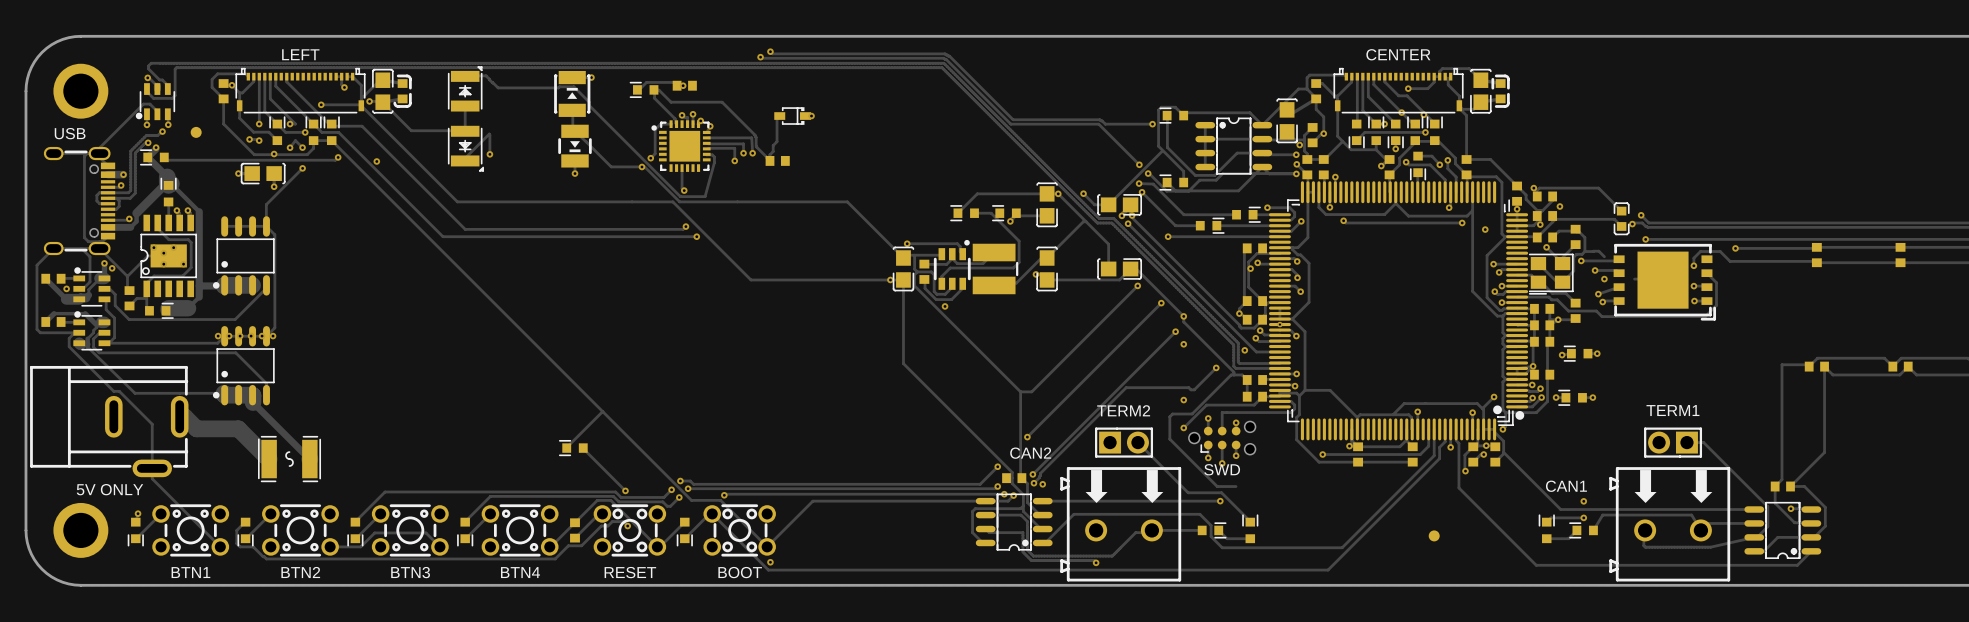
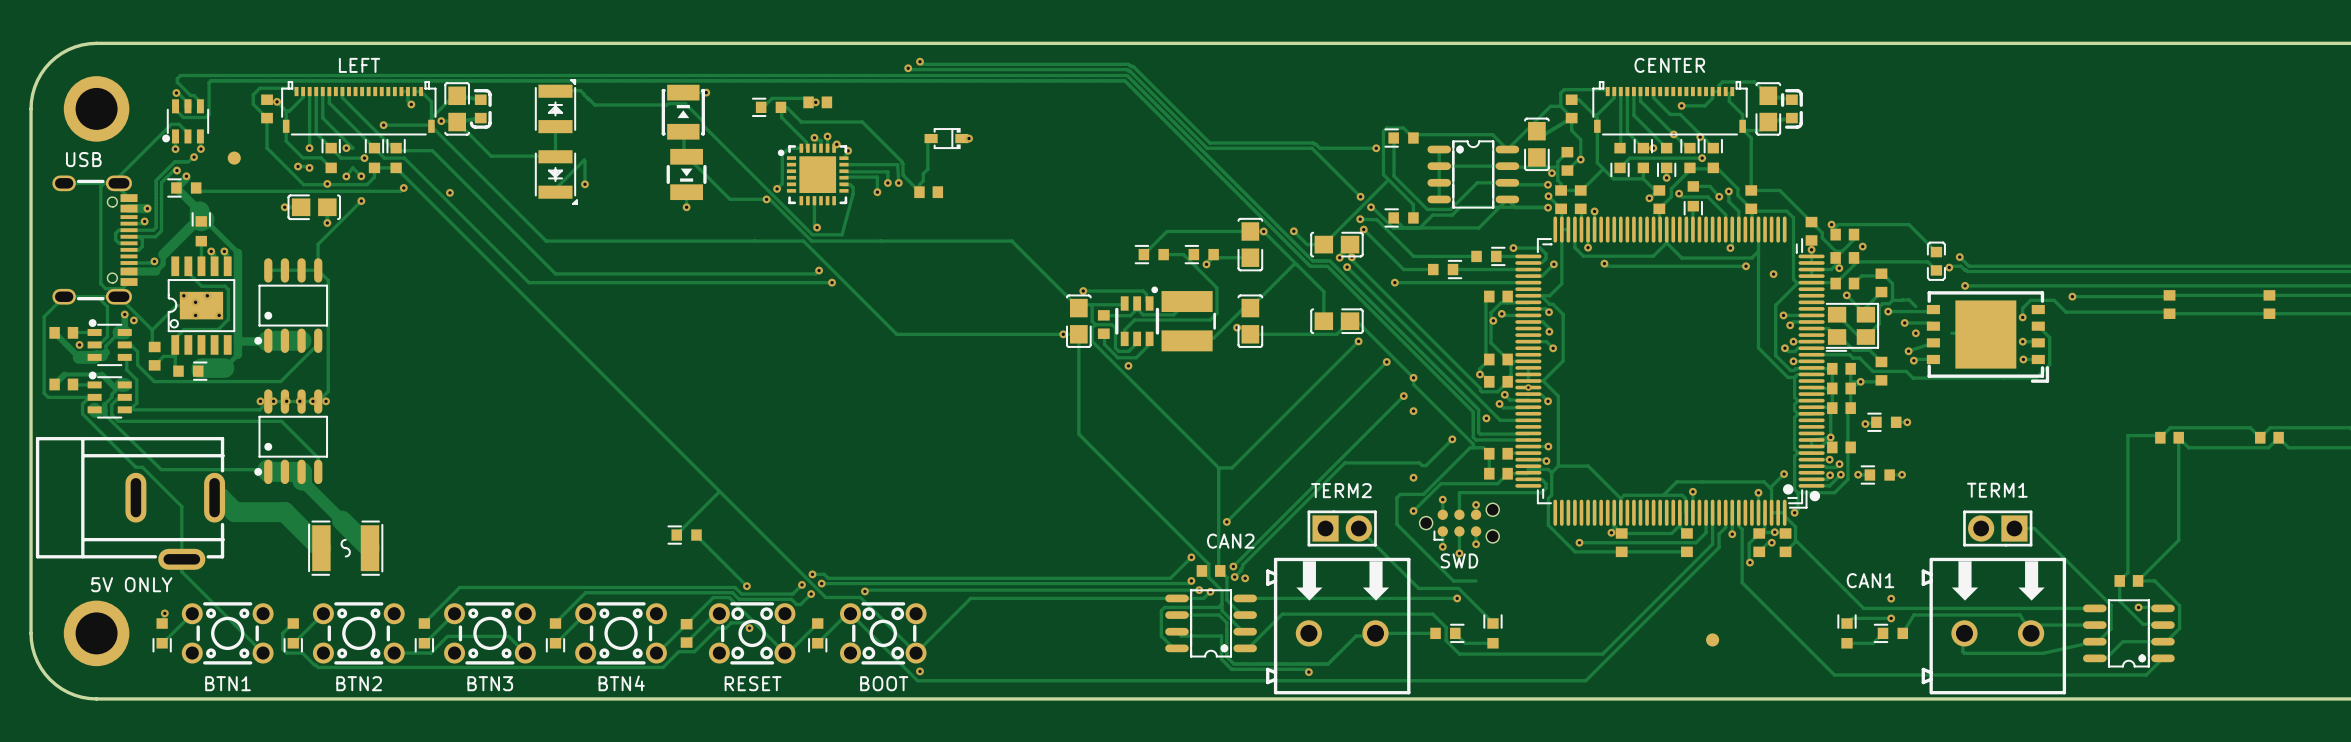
track width: thin (253, 402) (309, 459) -> thick (302, 480) (369, 548)

